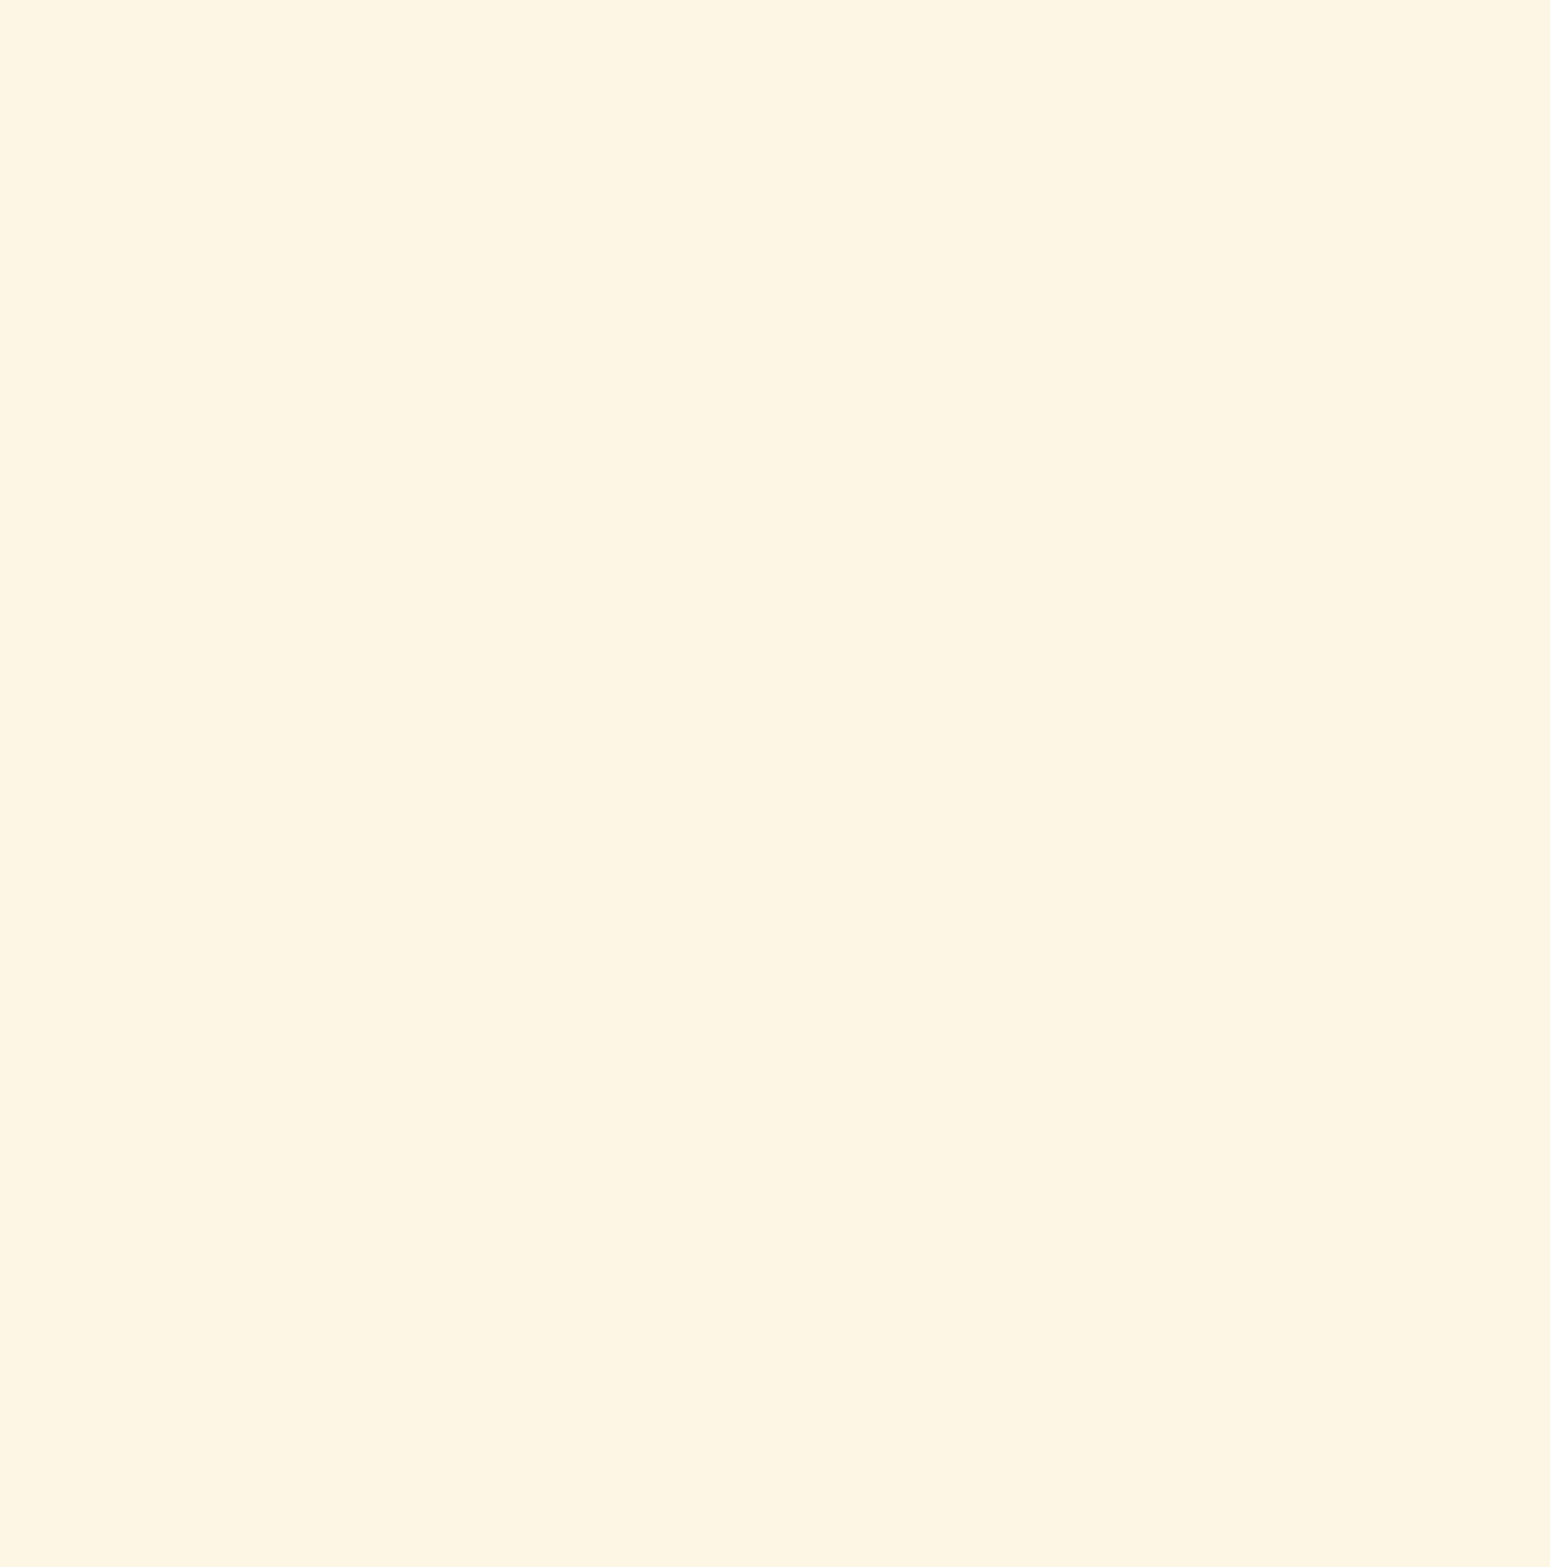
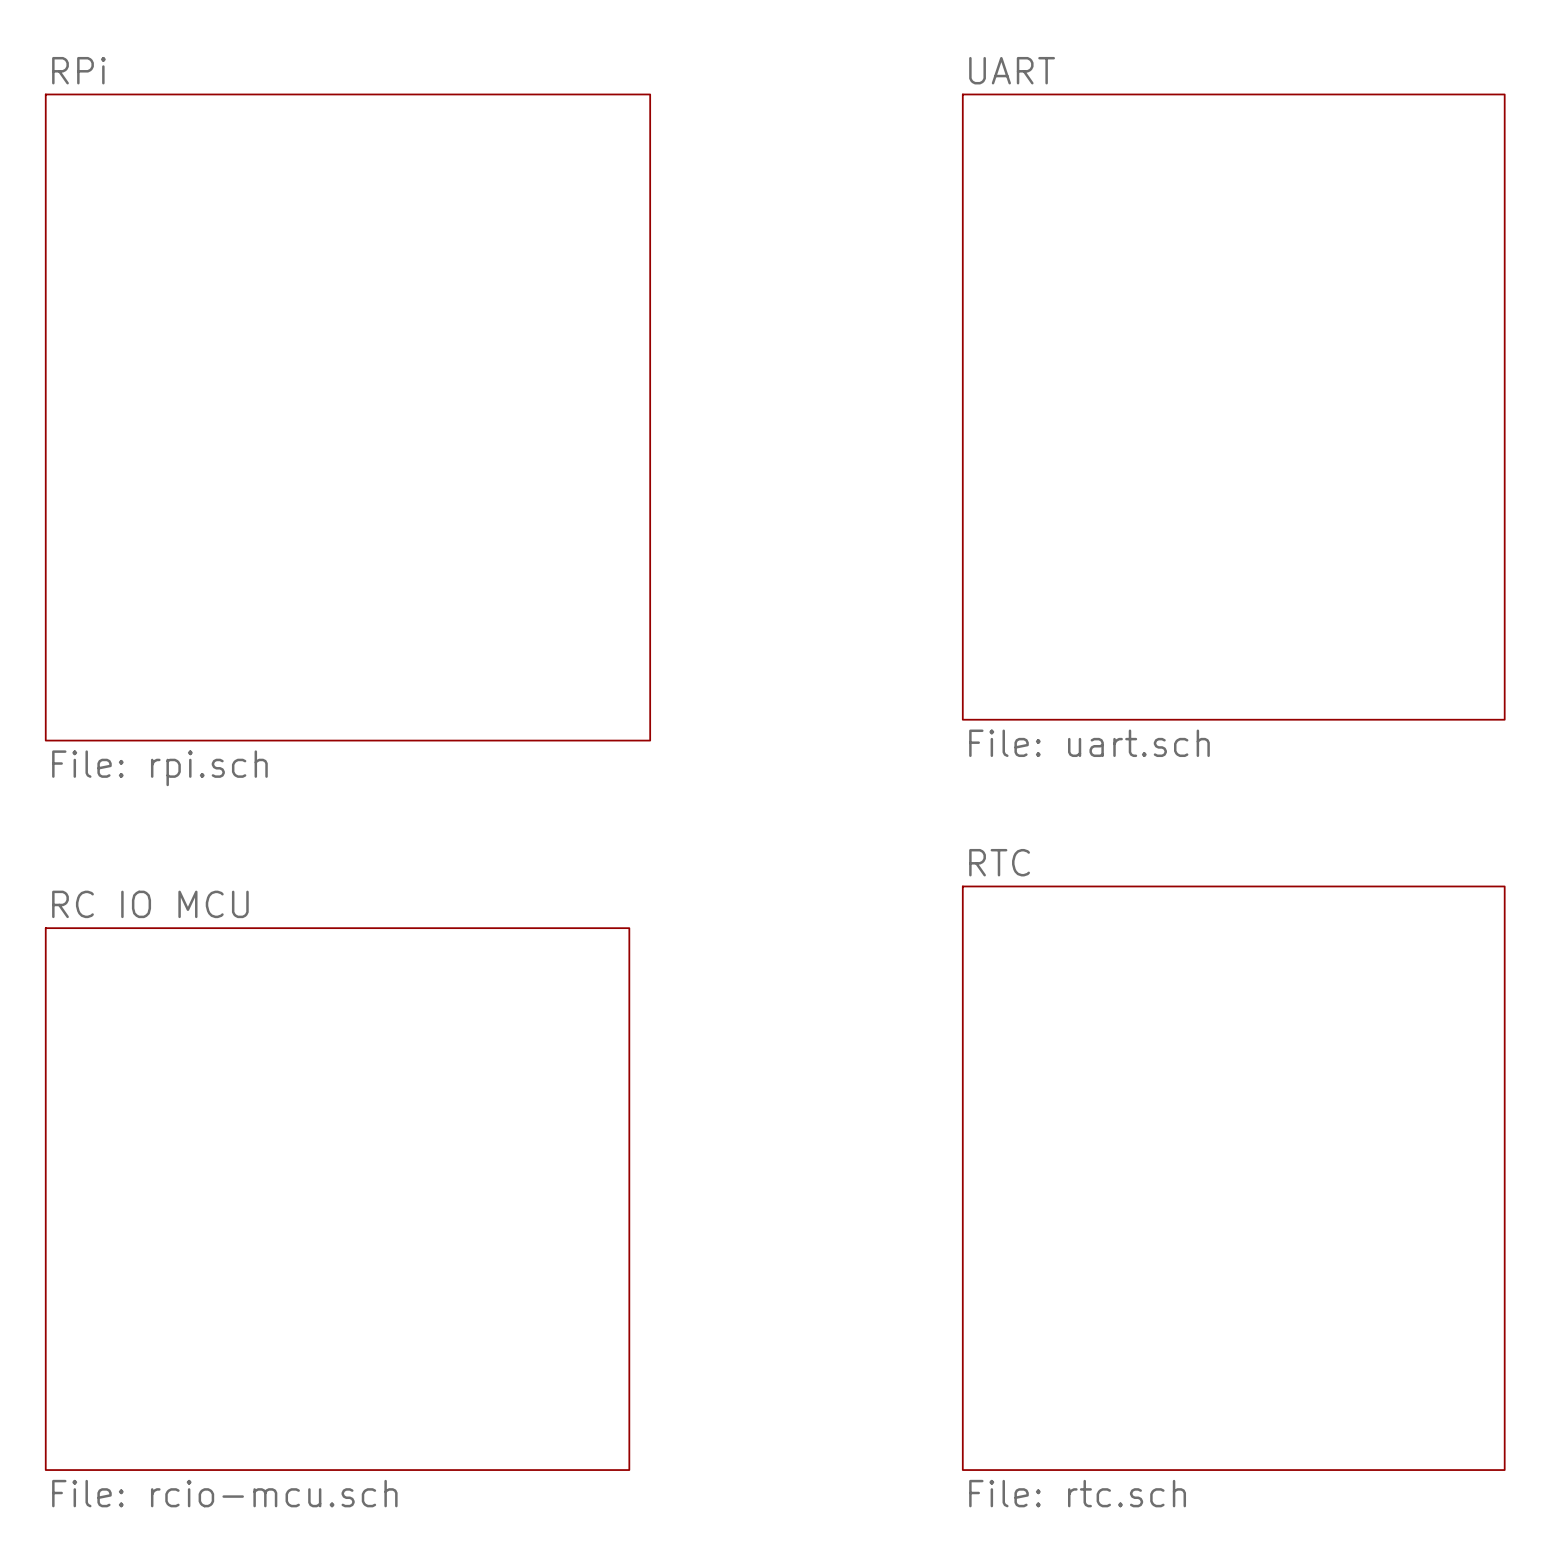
sheet UART: none -> File: uart.sch (1233, 407)
sheet RPi: none -> File: rpi.sch (347, 417)
sheet RTC: none -> File: rtc.sch (1233, 1178)
sheet RC IO MCU: none -> File: rcio-mcu.sch (337, 1199)

